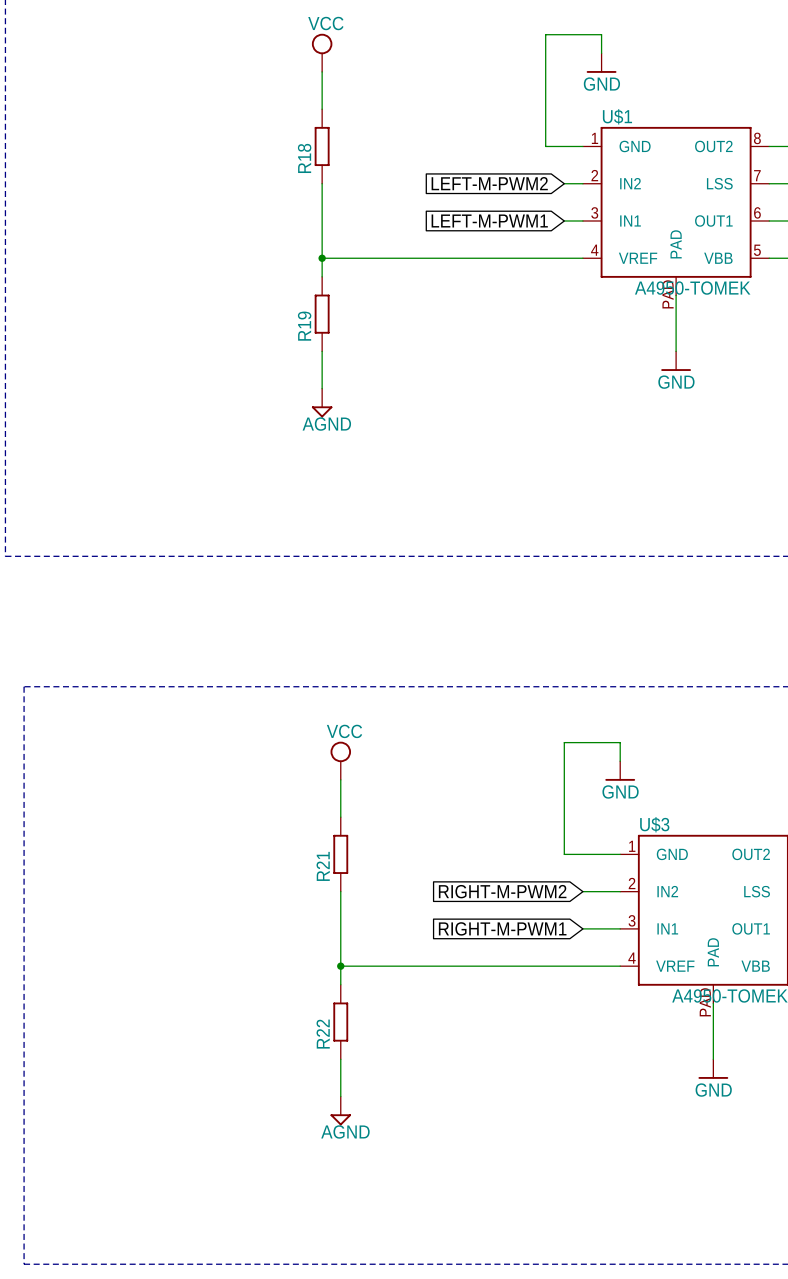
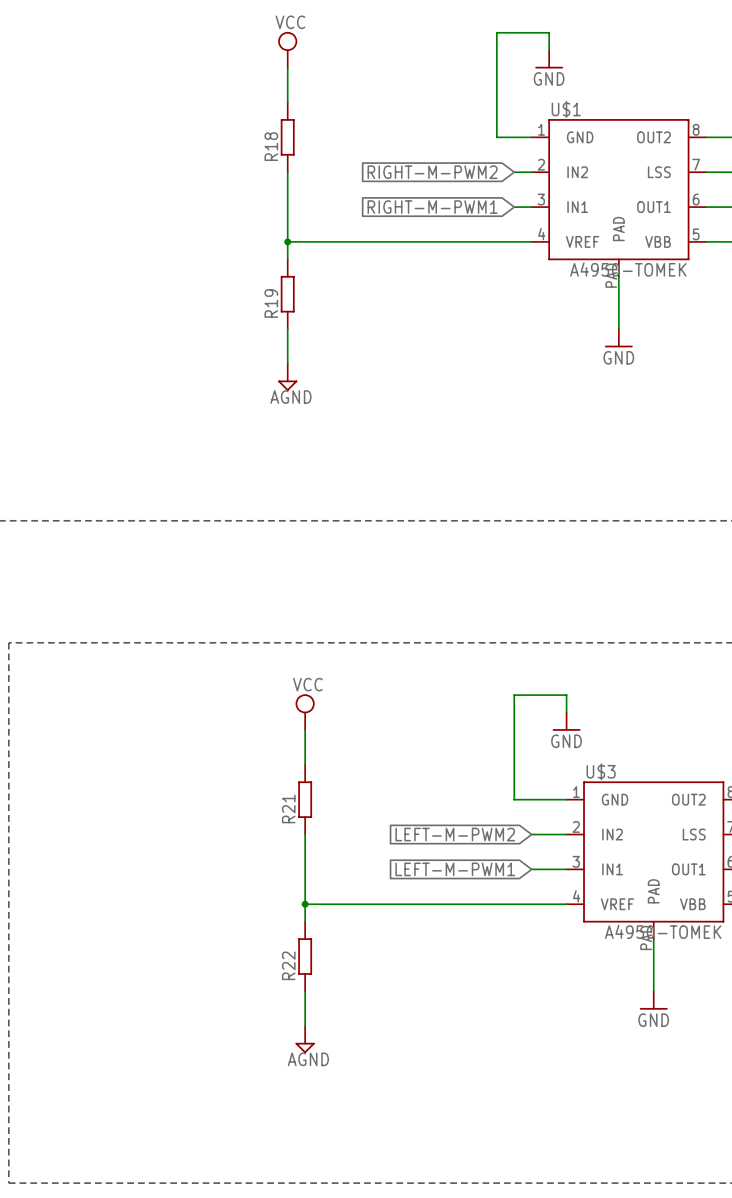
global label: LEFT-M-PWM2 (489, 183) -> RIGHT-M-PWM2 (432, 172)
global label: LEFT-M-PWM1 (489, 220) -> RIGHT-M-PWM1 (432, 207)
global label: RIGHT-M-PWM2 (502, 891) -> LEFT-M-PWM2 (455, 834)
global label: RIGHT-M-PWM1 (502, 928) -> LEFT-M-PWM1 (455, 869)

